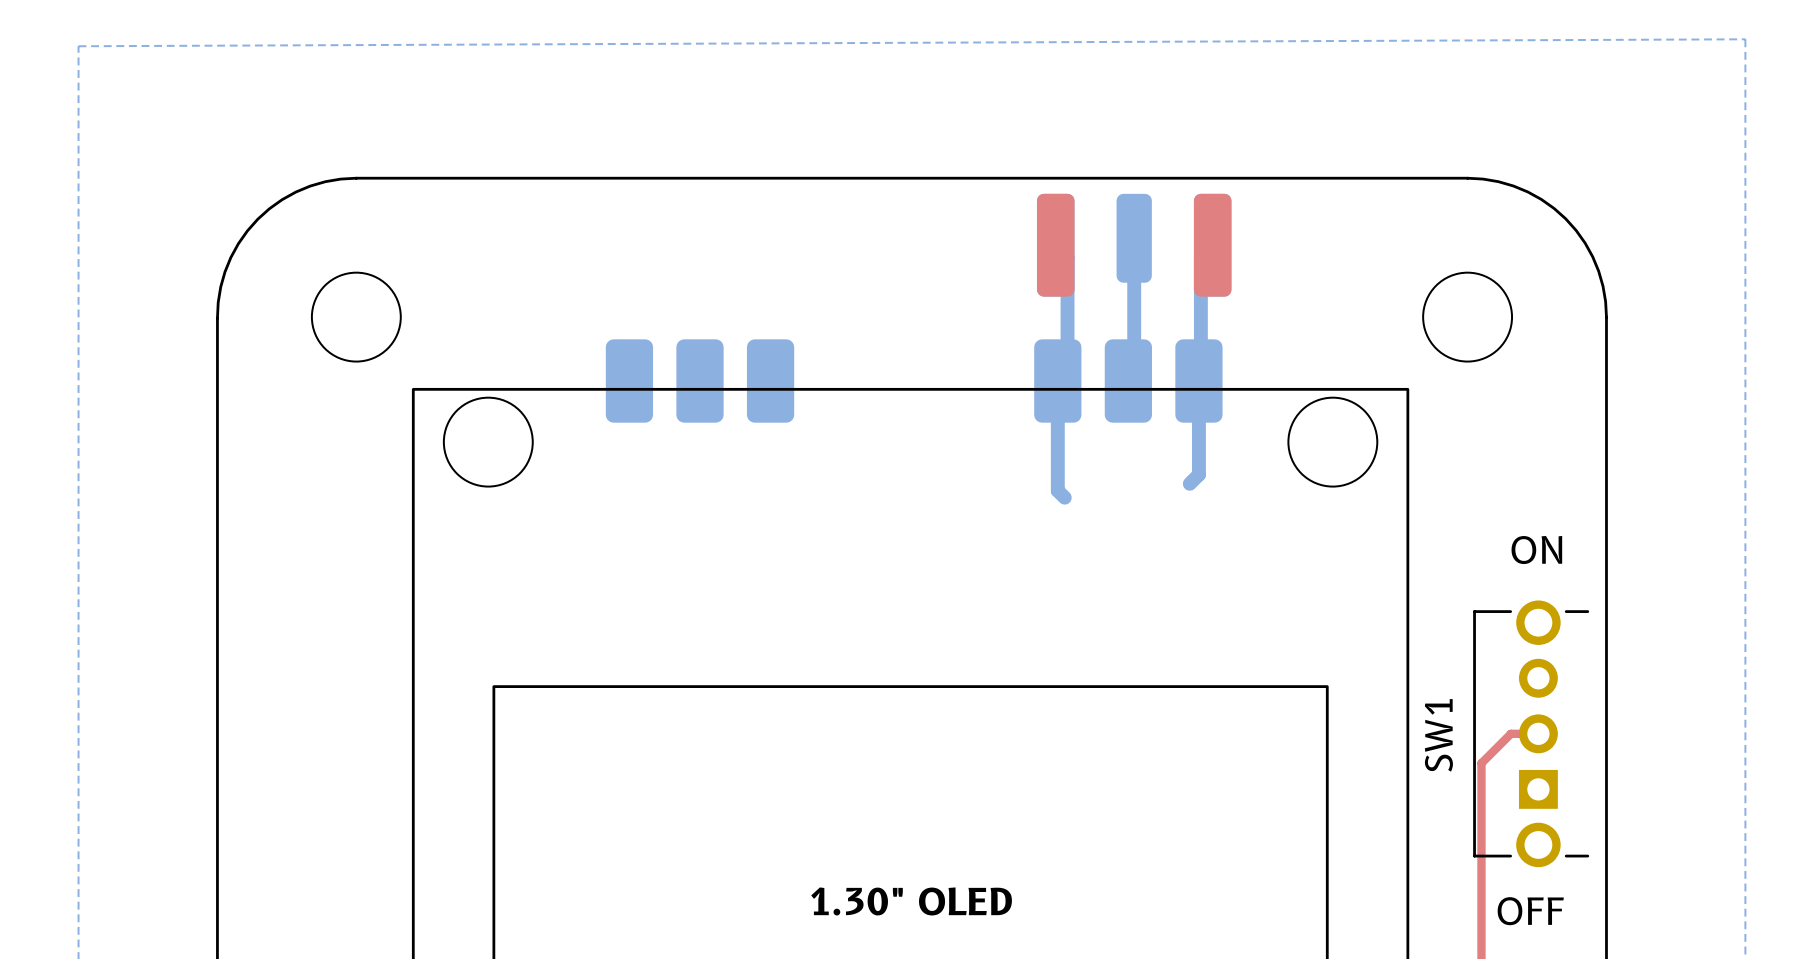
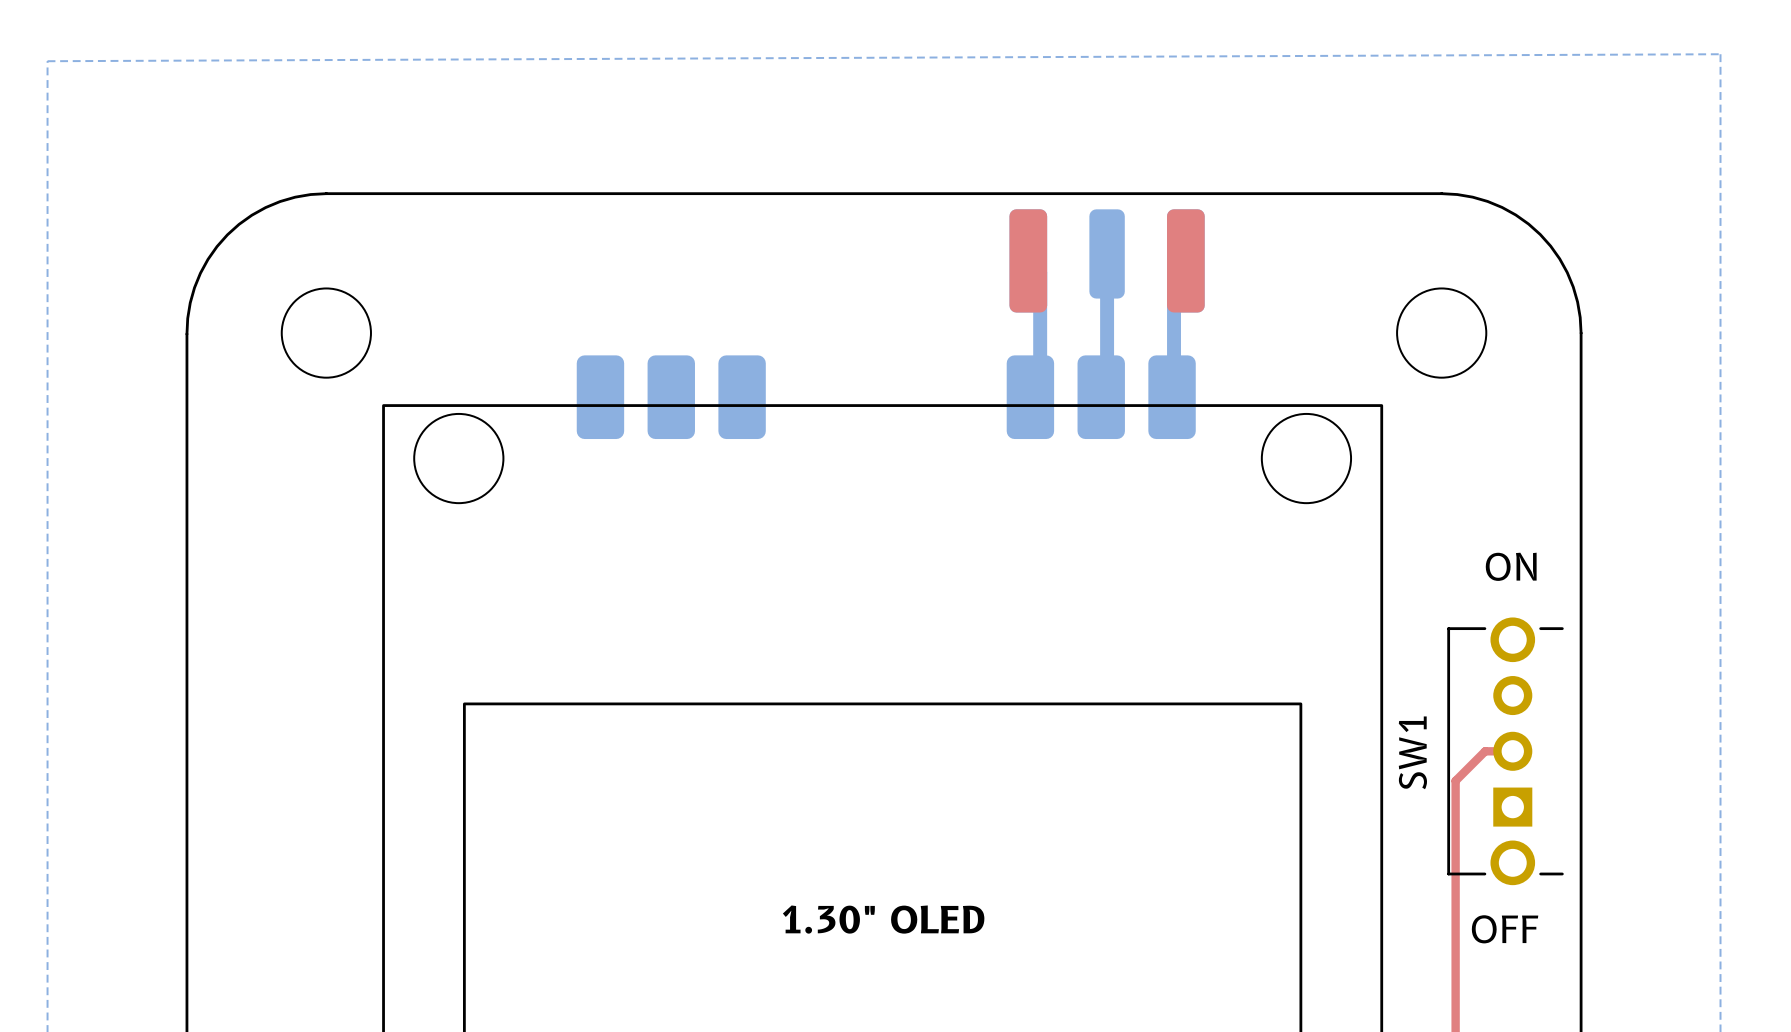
bottom track: (1057, 381) (1057, 490) (1064, 497) -> none
bottom track: (1198, 381) (1198, 474) (1189, 483) -> none

